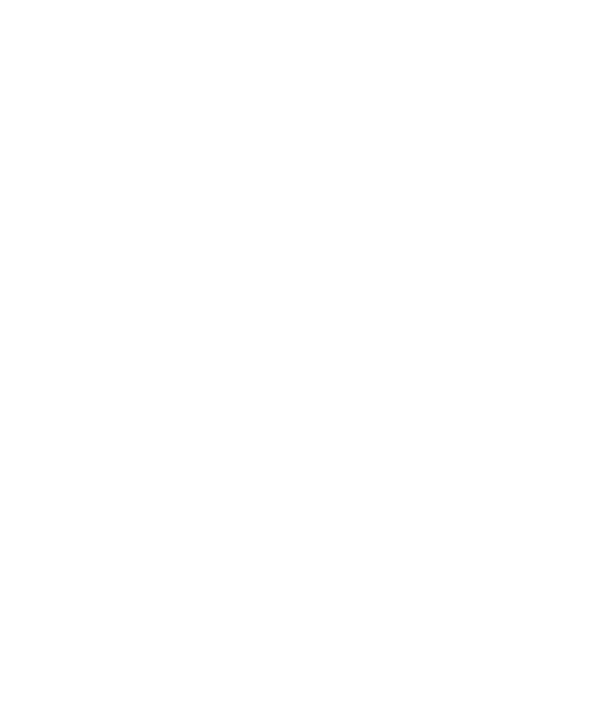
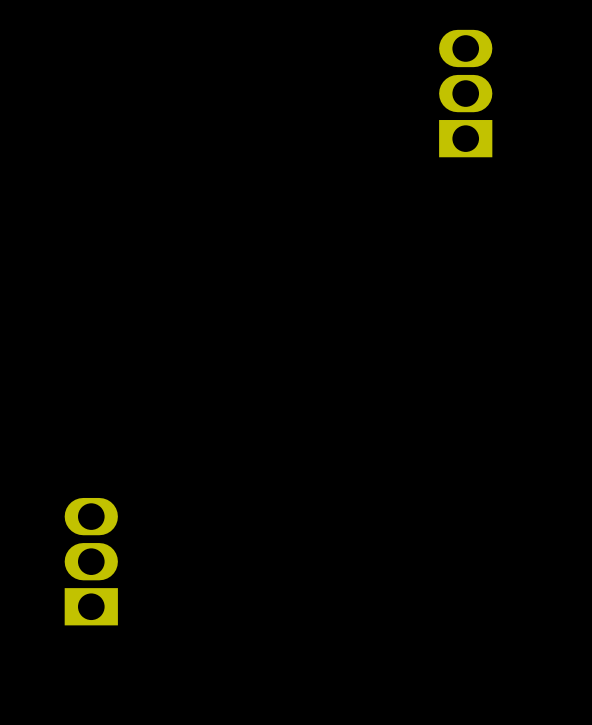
part: none -> (465, 93)
part: none -> (91, 561)

